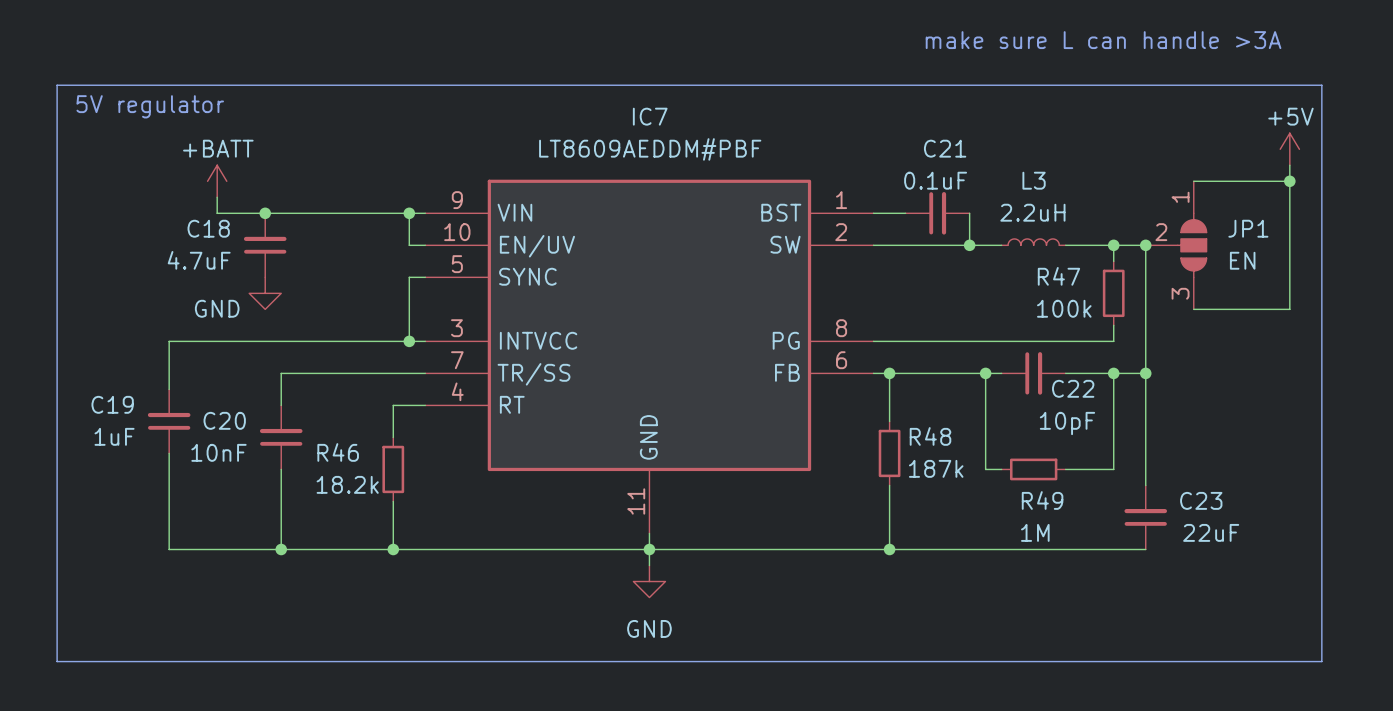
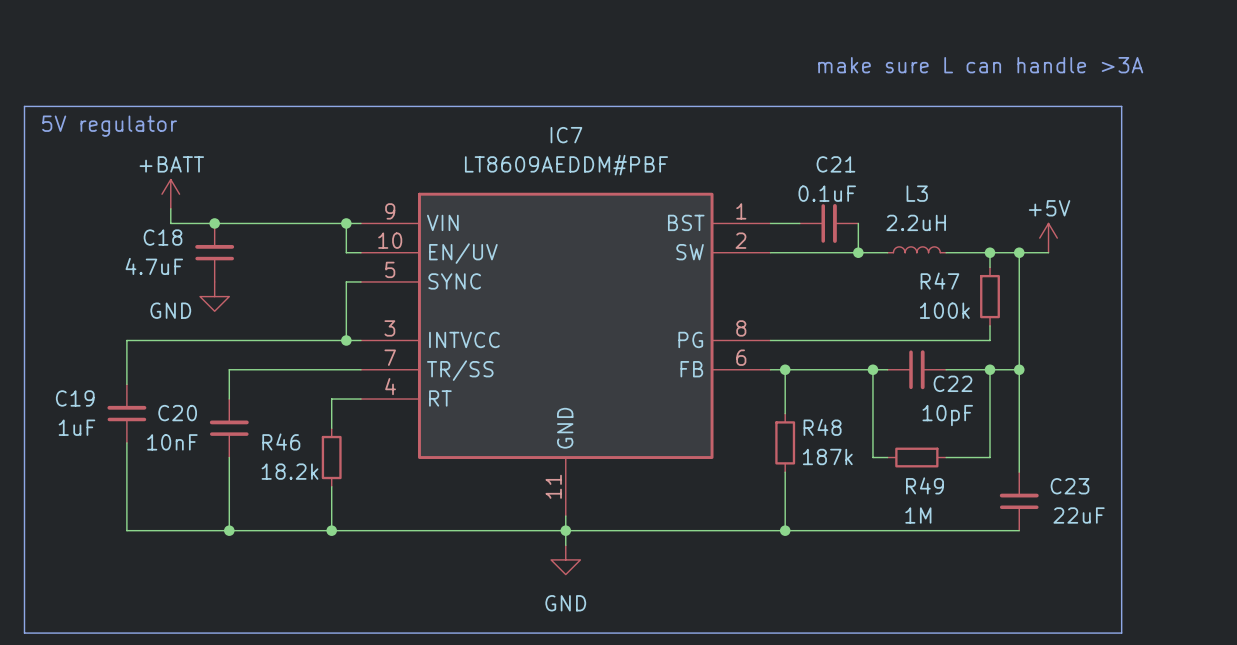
line: (1257, 85) (1321, 85) (1321, 661) (1257, 661) -> (1121, 106) (1121, 633)
power symbol position: +5V (1289, 149) -> +5V (1048, 238)
wire: (1289, 165) (1289, 309) (1193, 309) -> none
wire: (1193, 181) (1289, 181) -> none
junction: (1289, 181) -> none
JP1: EN (1176, 245) -> none

